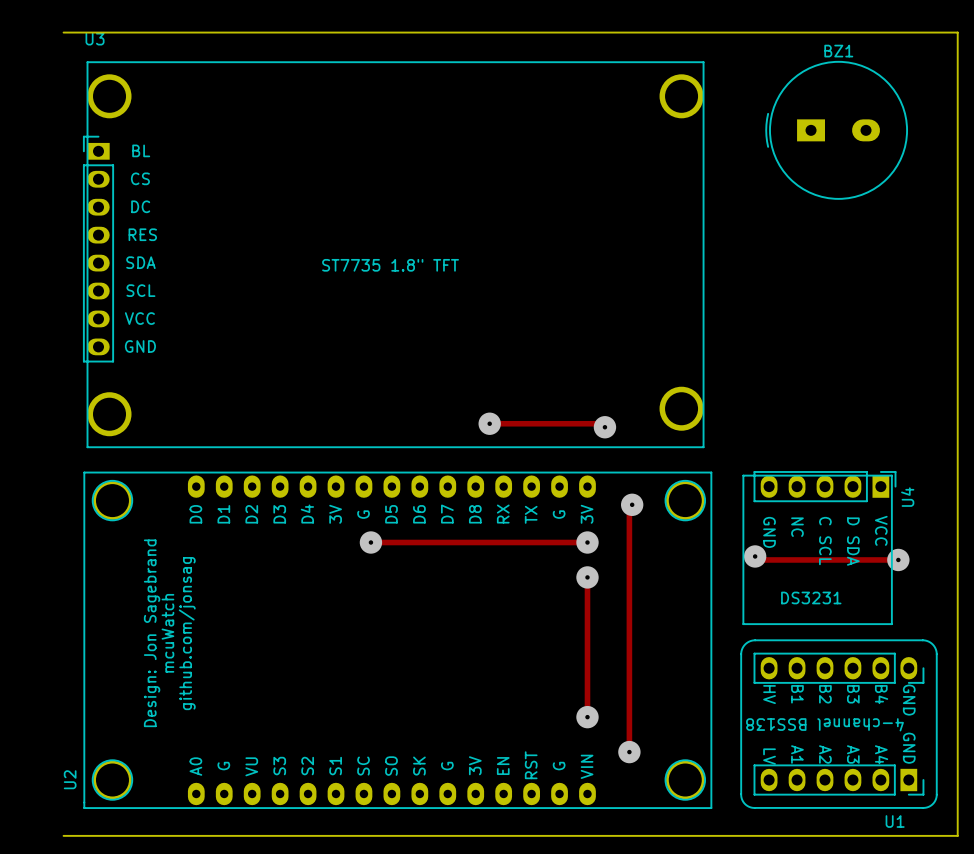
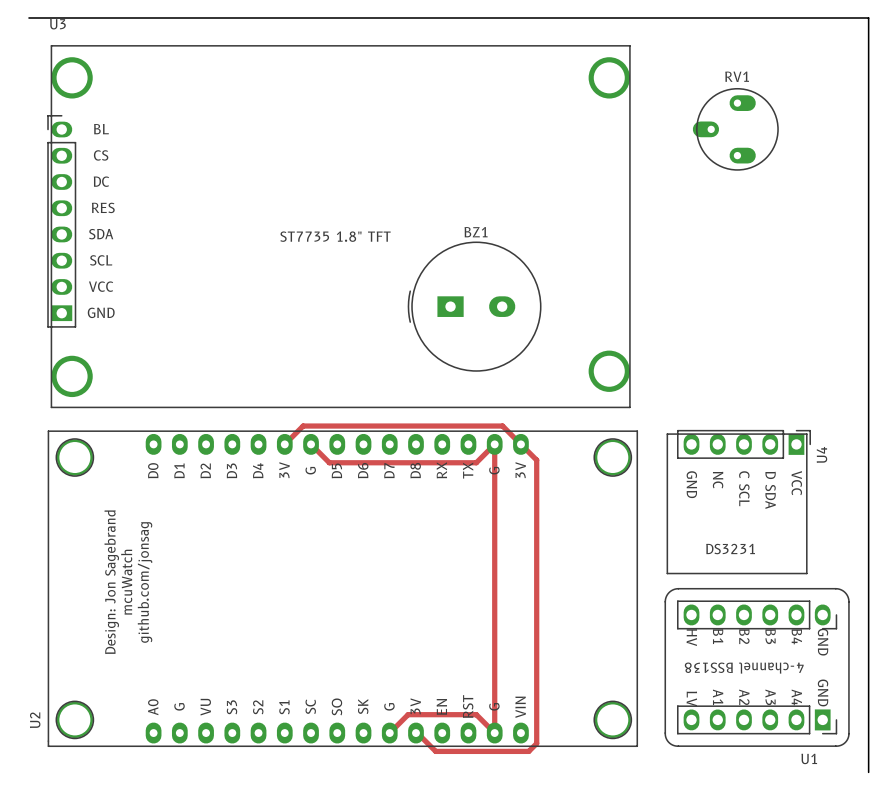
U3 footprint: [83, 61, 705, 449] -> [47, 45, 631, 409]
BZ1 position: (836, 130) -> (474, 306)
RV1: none -> (735, 129)
track: (489, 423) (598, 423) (604, 427) -> none
via: (489, 423) -> none
via: (604, 427) -> none
track: none -> (284, 444) (303, 426) (502, 426) (536, 460) (536, 743) (528, 751) (435, 751) (415, 731) (415, 726)
track: none -> (311, 444) (329, 462) (476, 462) (494, 444) (494, 733) (476, 714) (408, 714) (389, 733)
track: (632, 504) (629, 509) (629, 752) -> none
via: (632, 504) -> none
track: (370, 542) (587, 542) -> none
via: (370, 542) -> none
via: (587, 542) -> none
track: (755, 556) (761, 559) (898, 559) -> none
via: (755, 556) -> none
via: (898, 559) -> none
track: (587, 577) (587, 717) -> none
via: (587, 577) -> none
via: (587, 717) -> none
via: (629, 752) -> none
board edge: (63, 835) (957, 835) -> none

